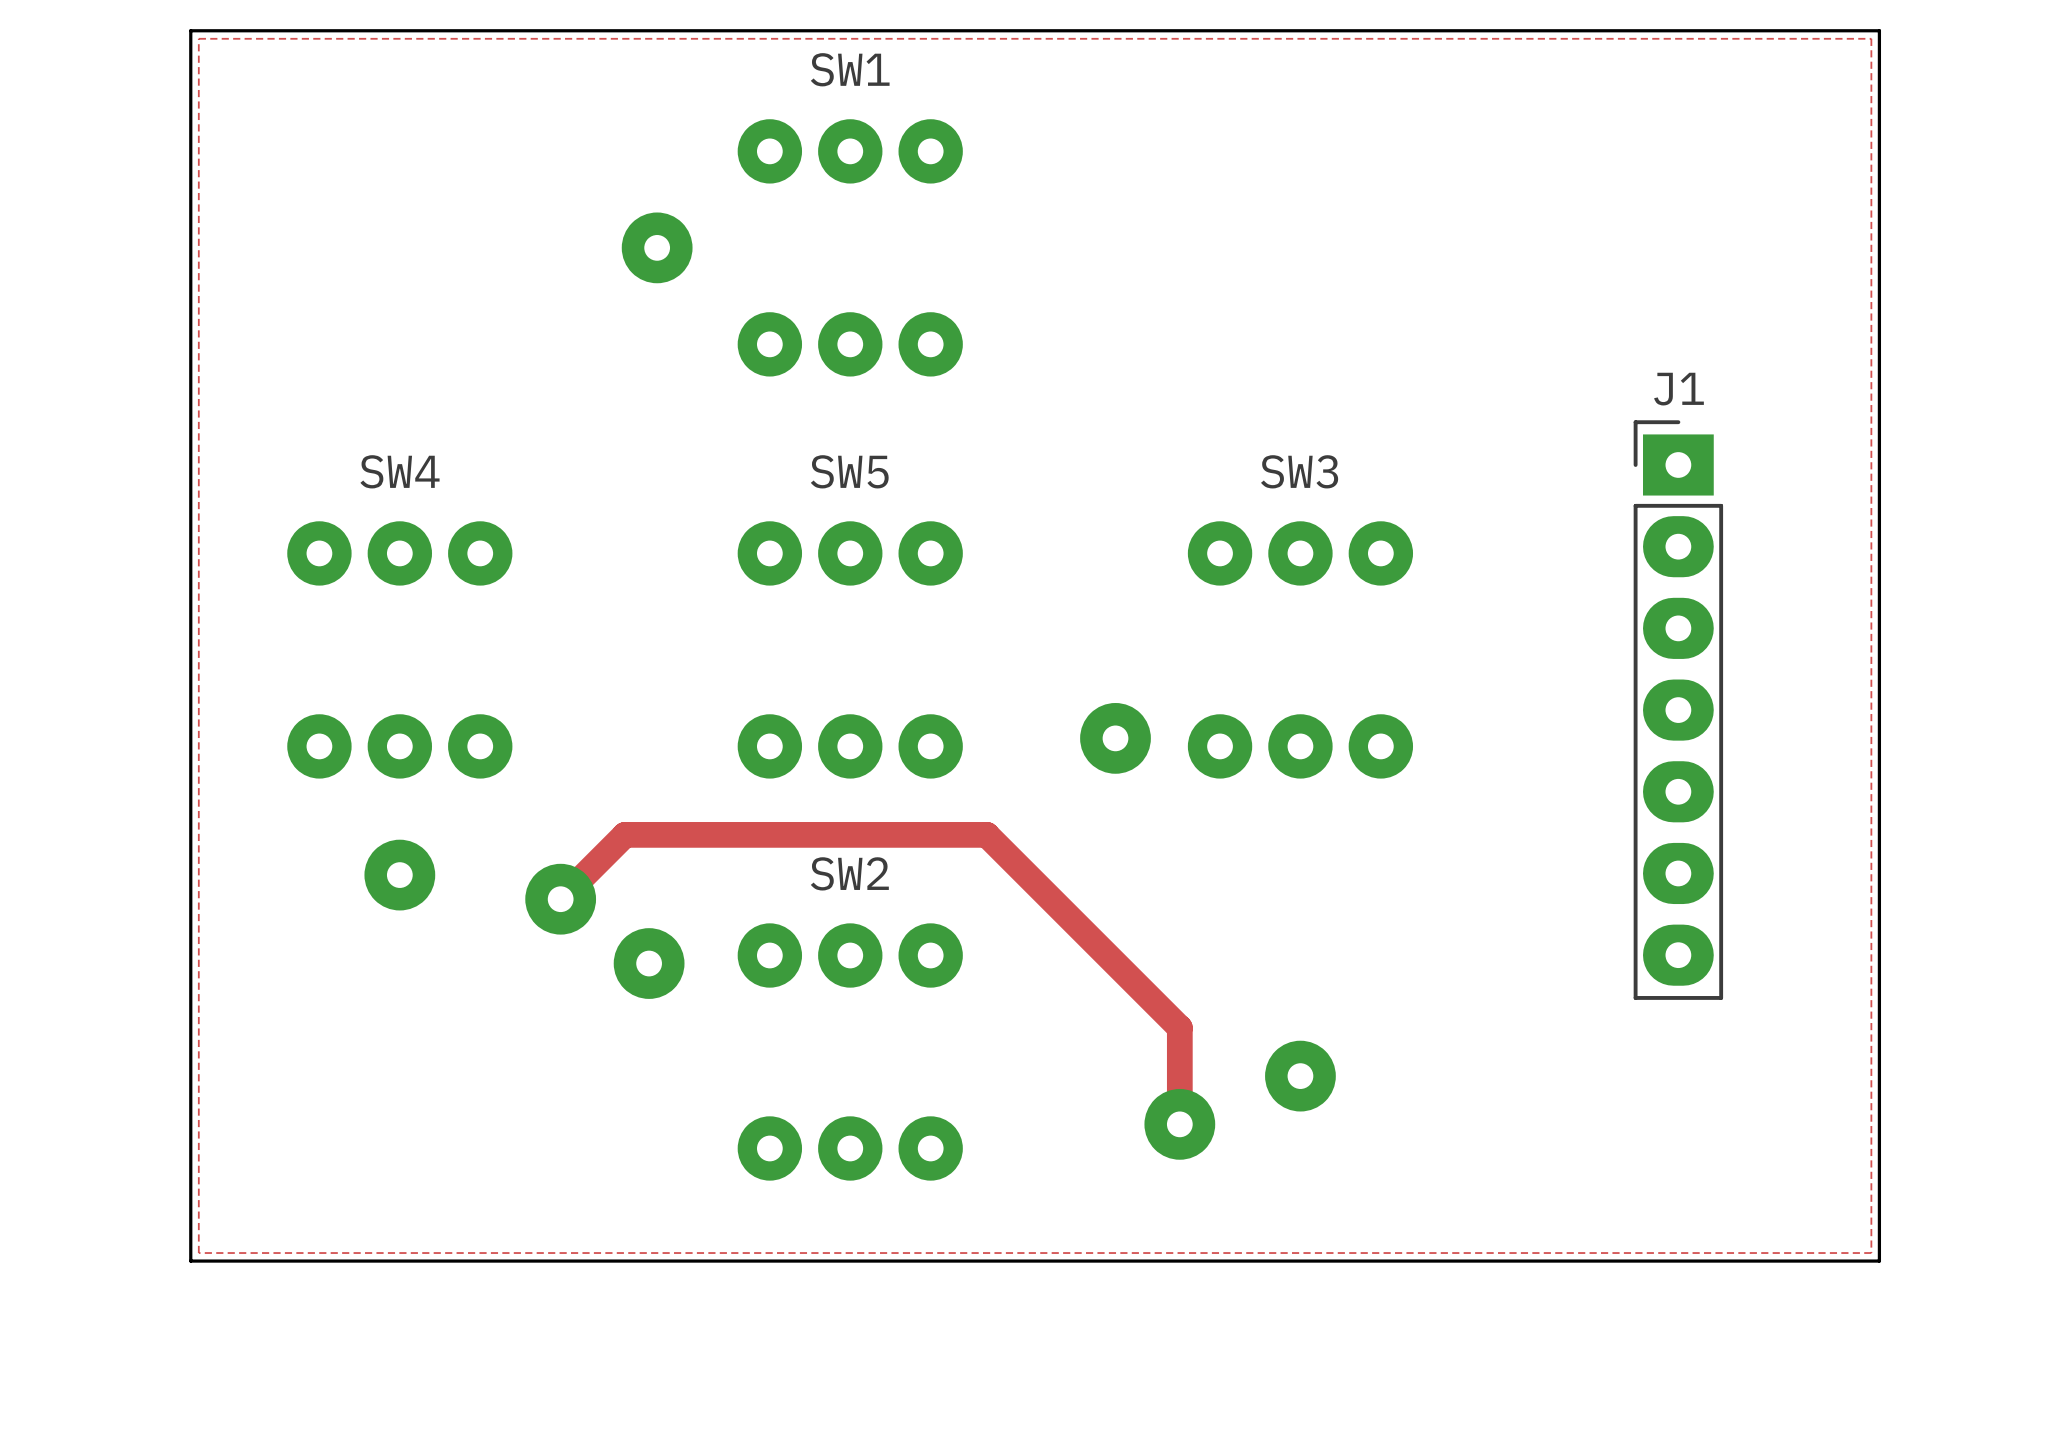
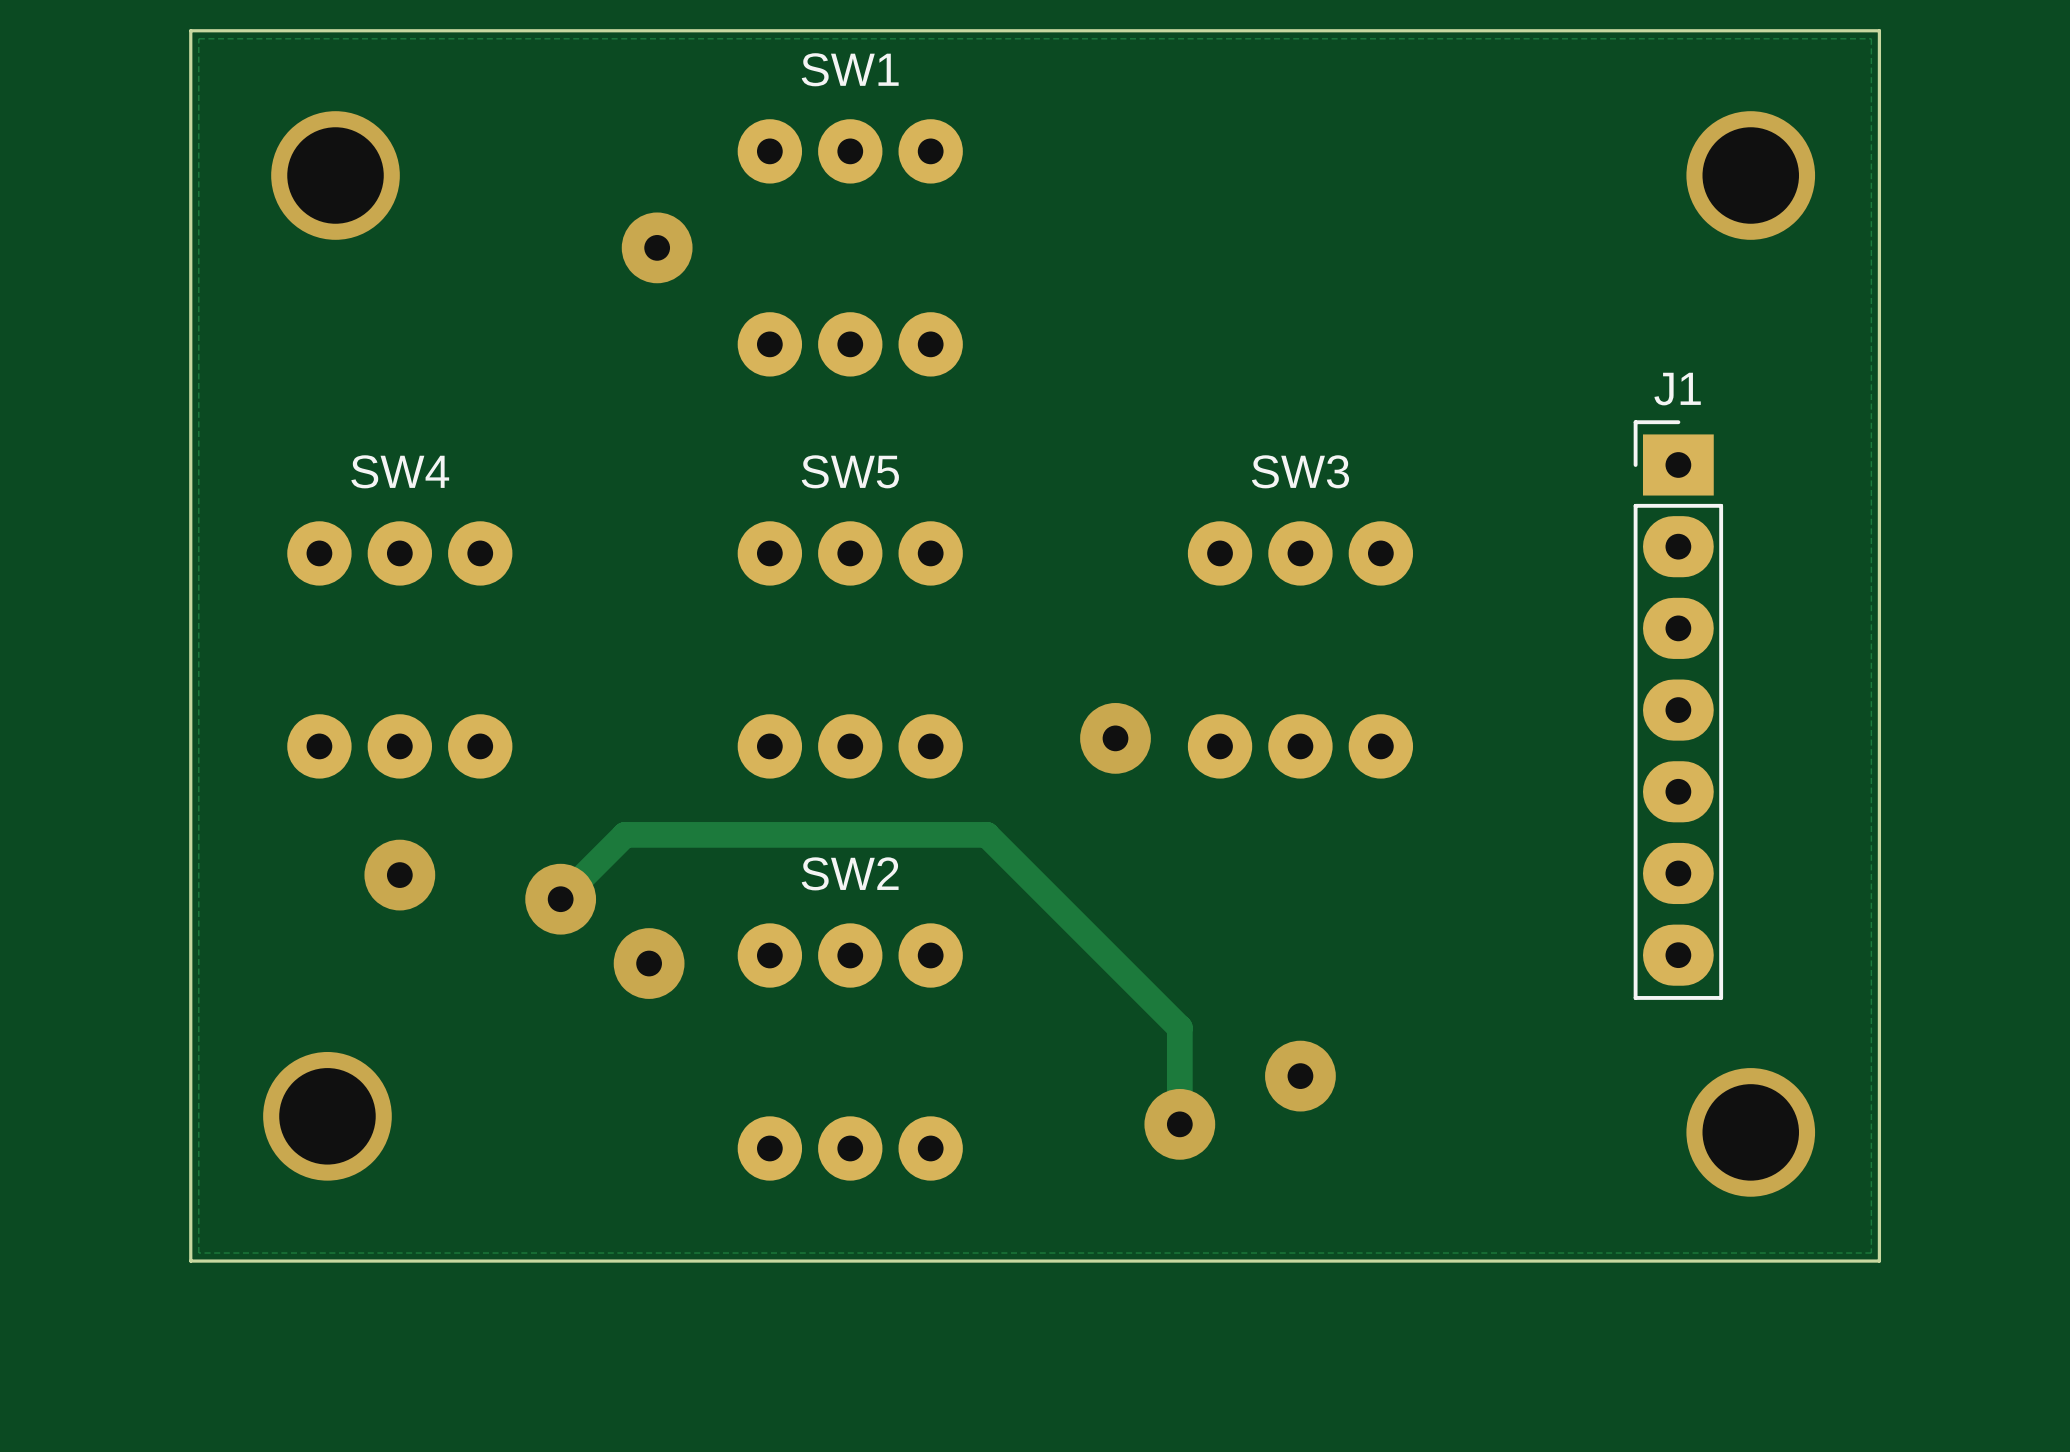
via: none -> (335, 175)
via: none -> (1750, 175)
via: none -> (327, 1116)
via: none -> (1750, 1132)

